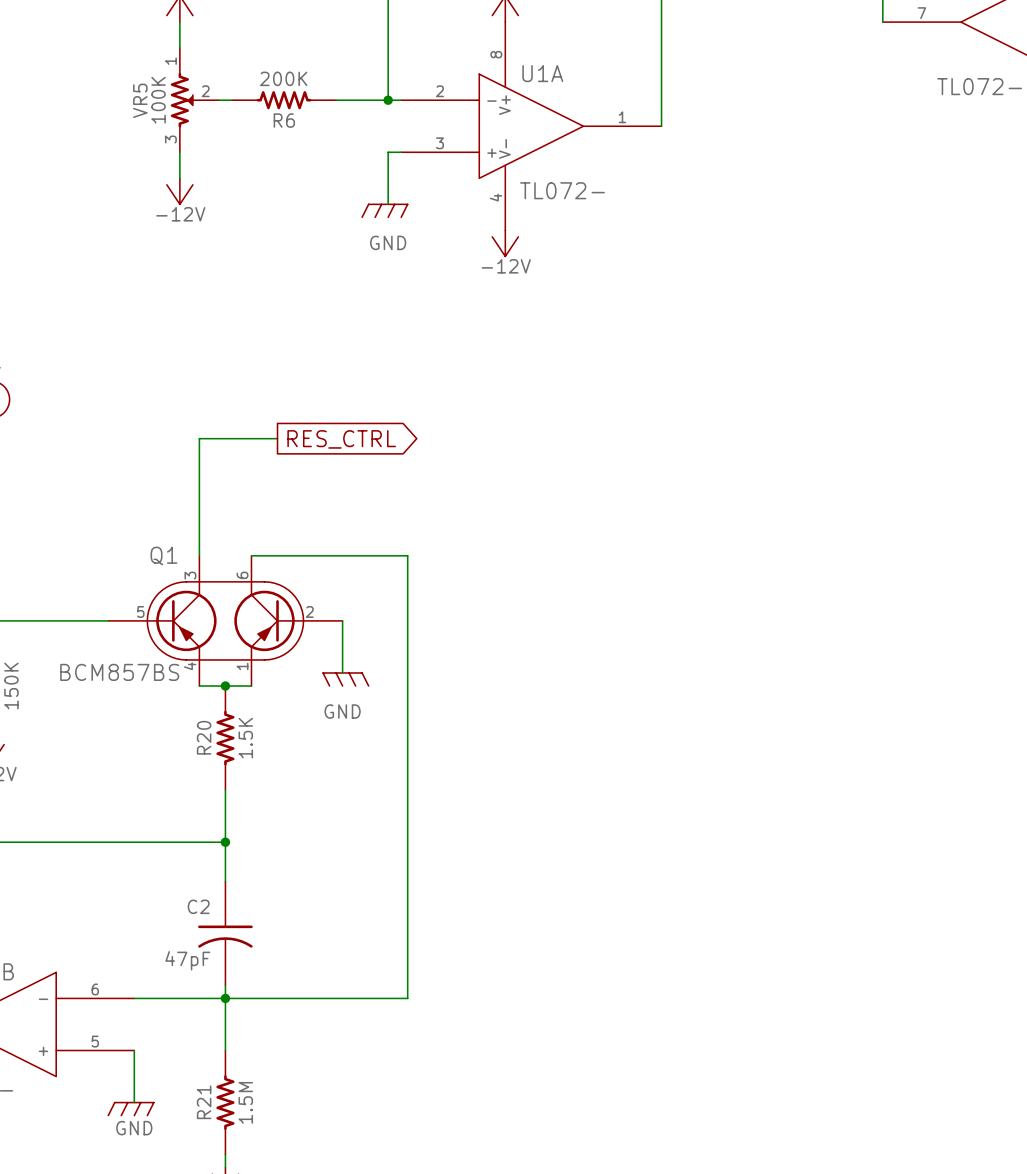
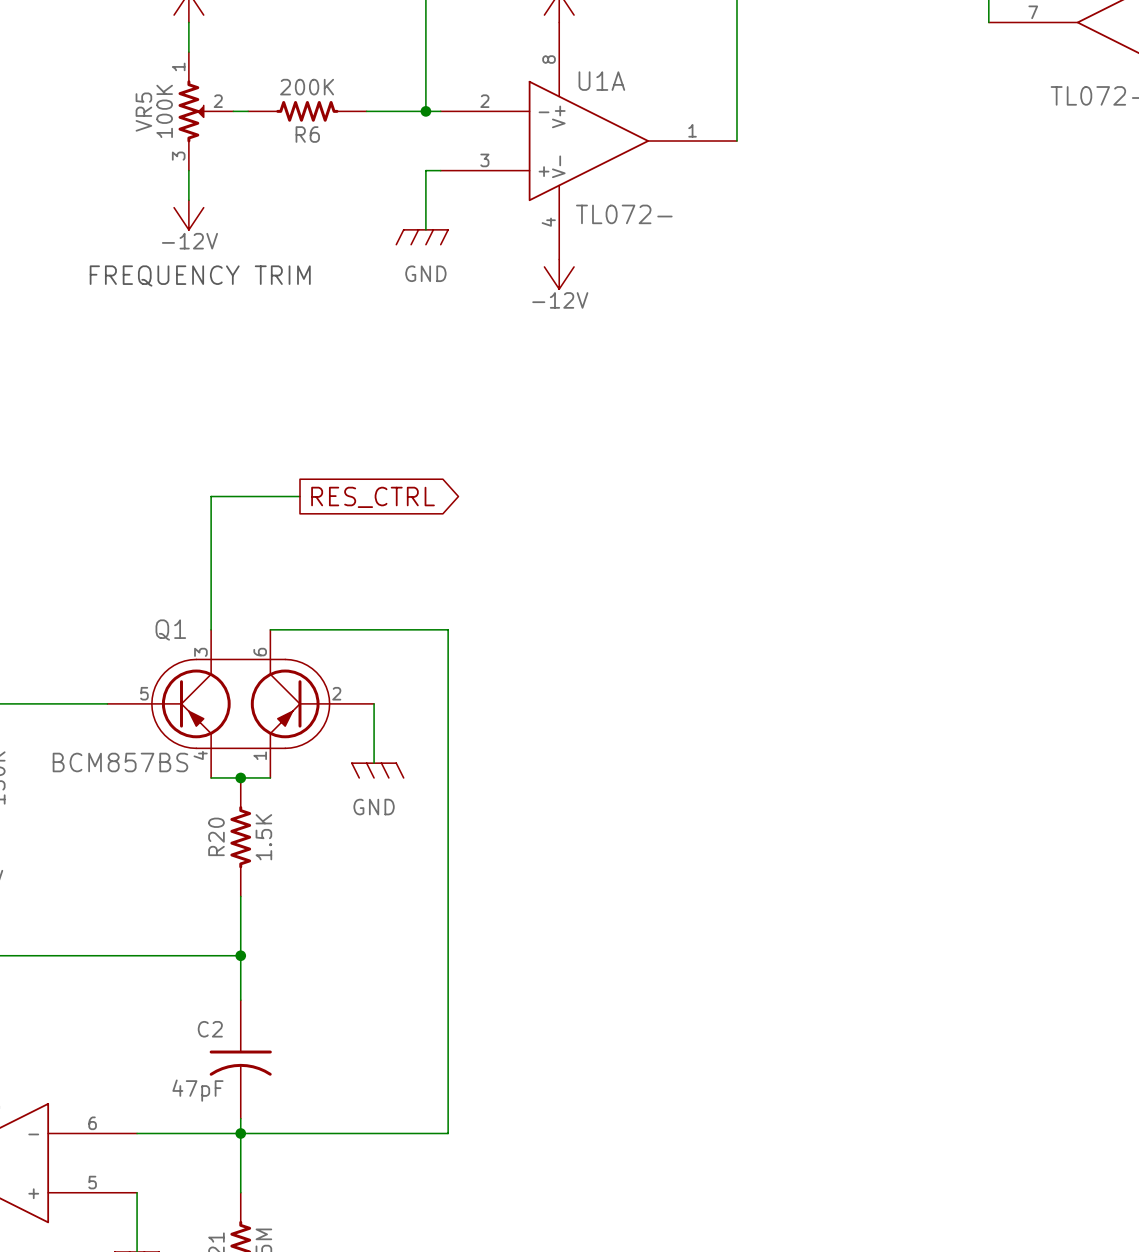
text: none -> FREQUENCY TRIM (200, 276)

